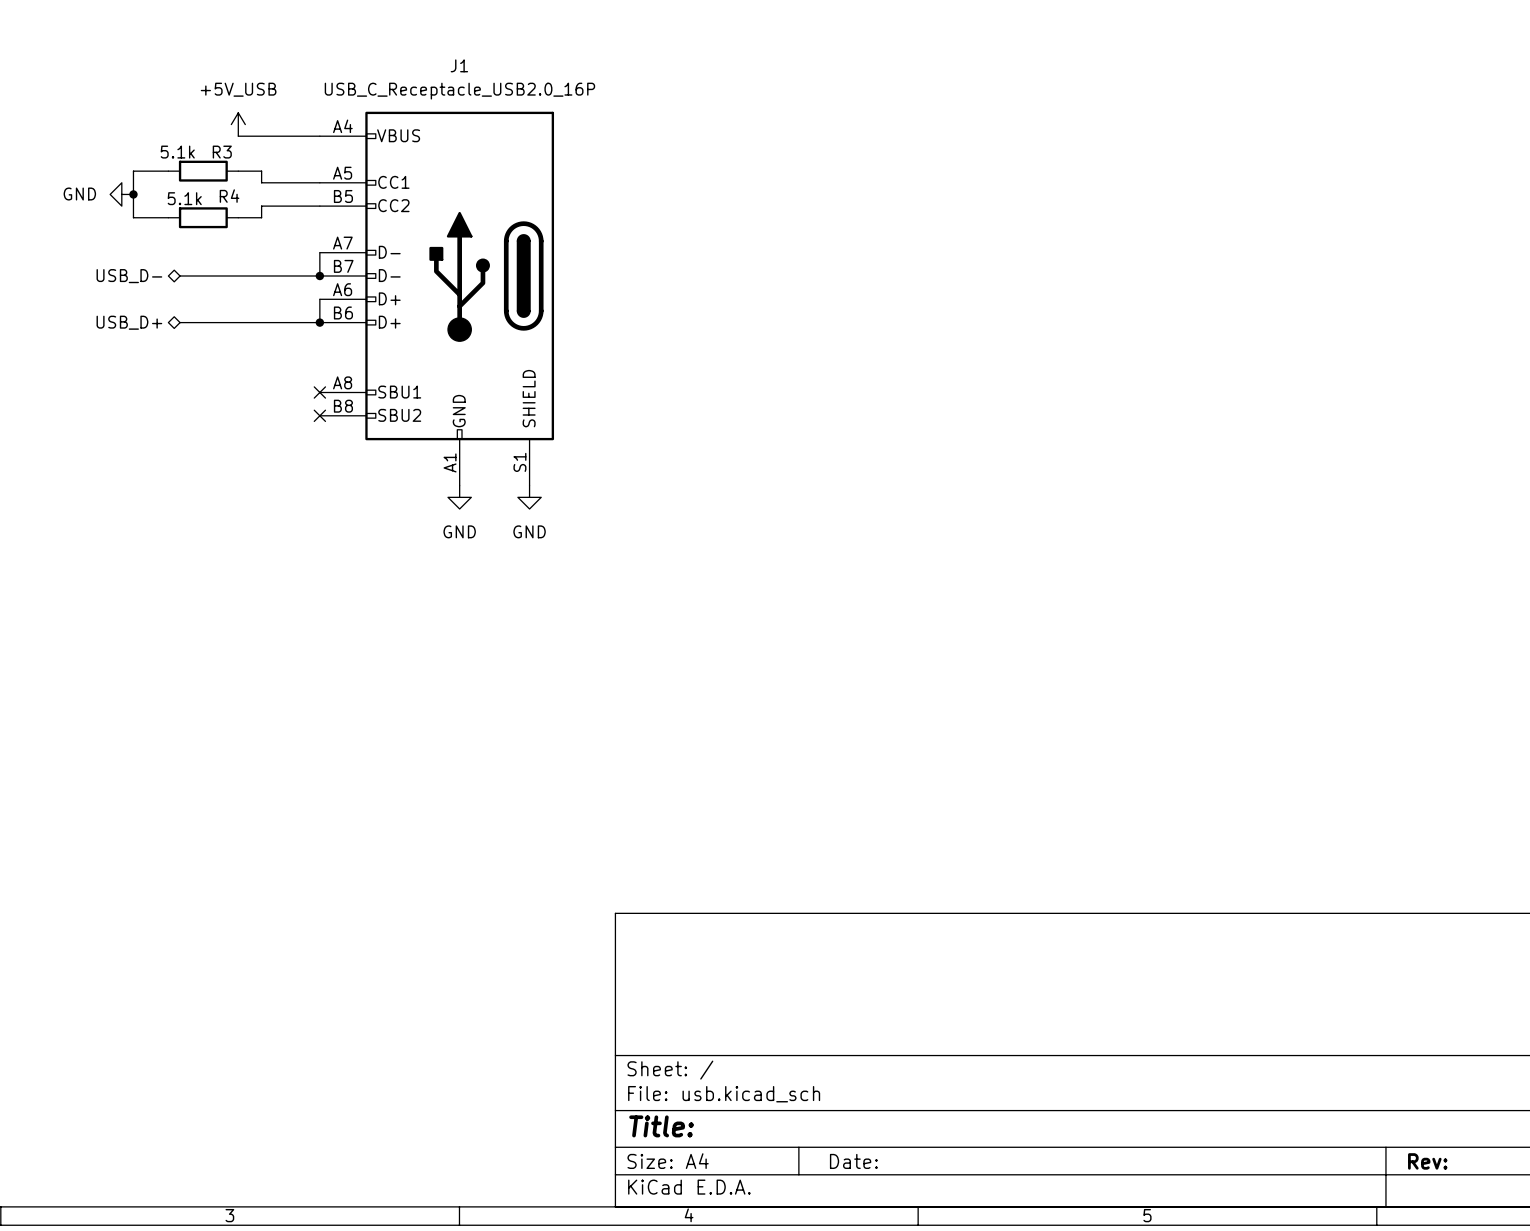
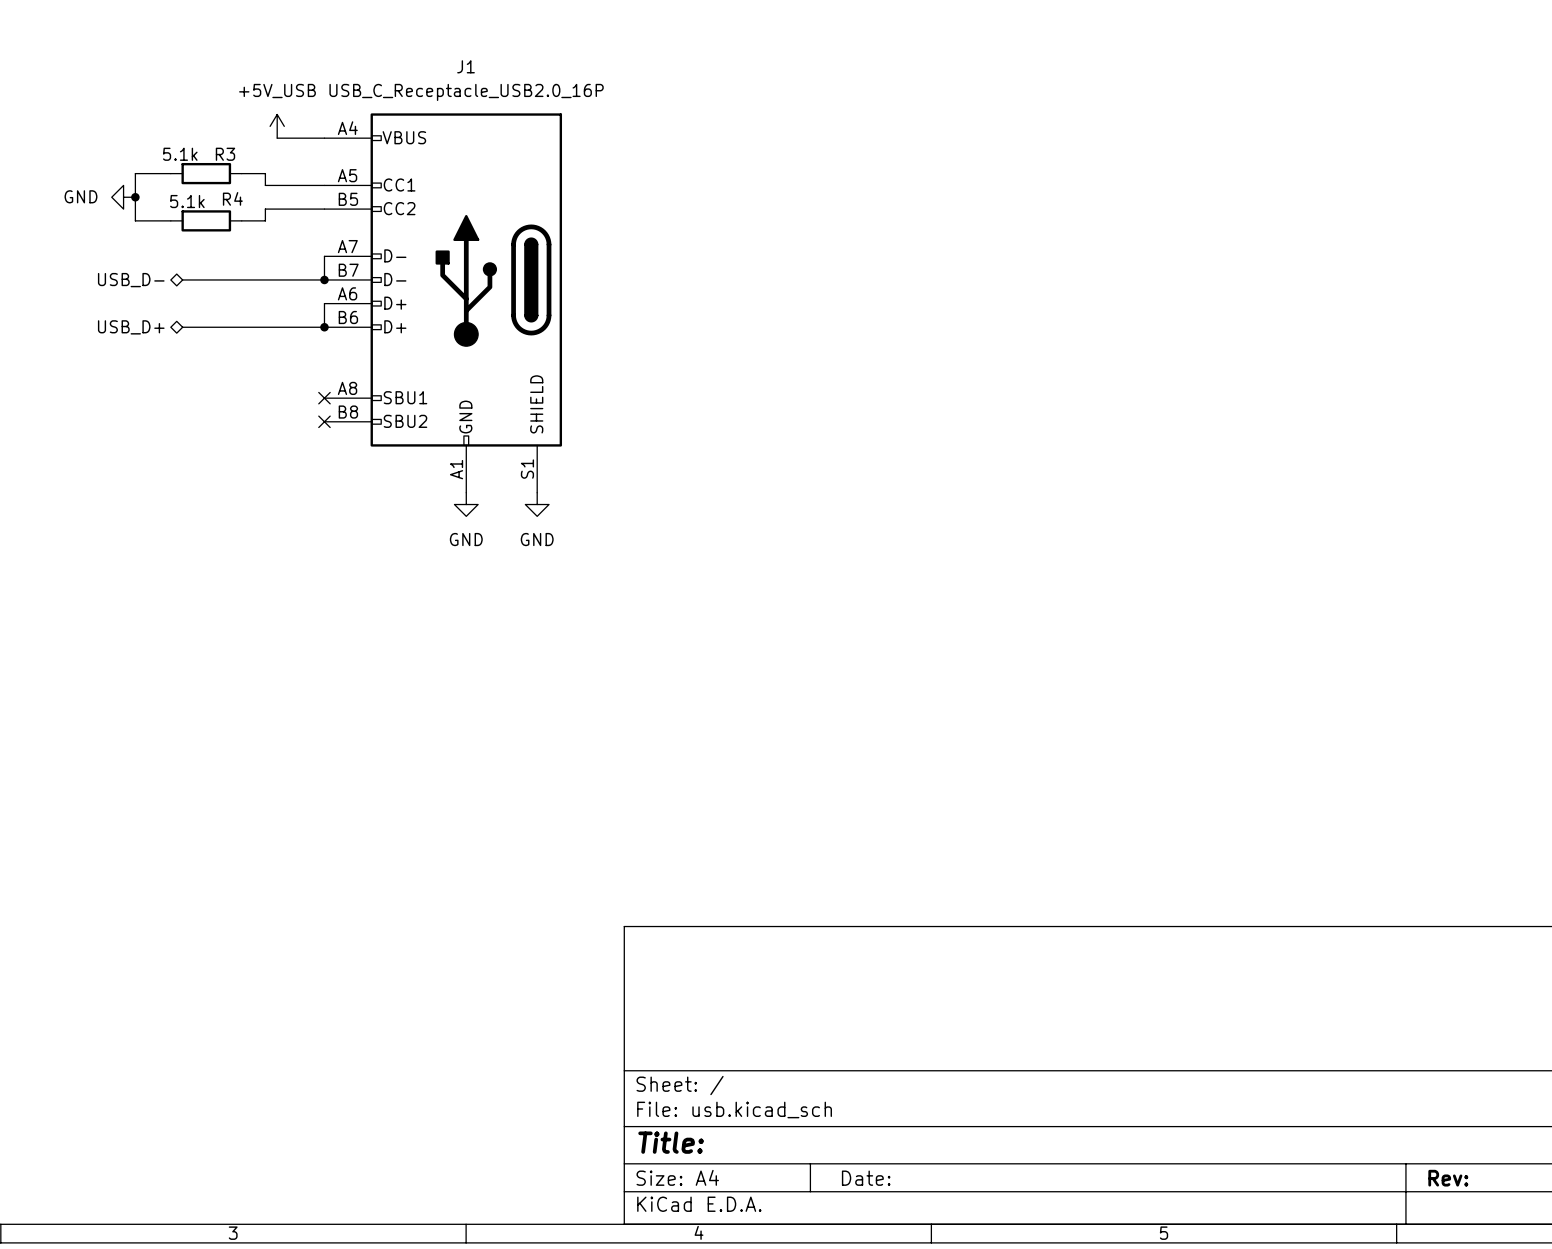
power symbol position: +5V_USB (238, 124) -> +5V_USB (277, 126)
wire: (238, 136) (273, 136) -> none

